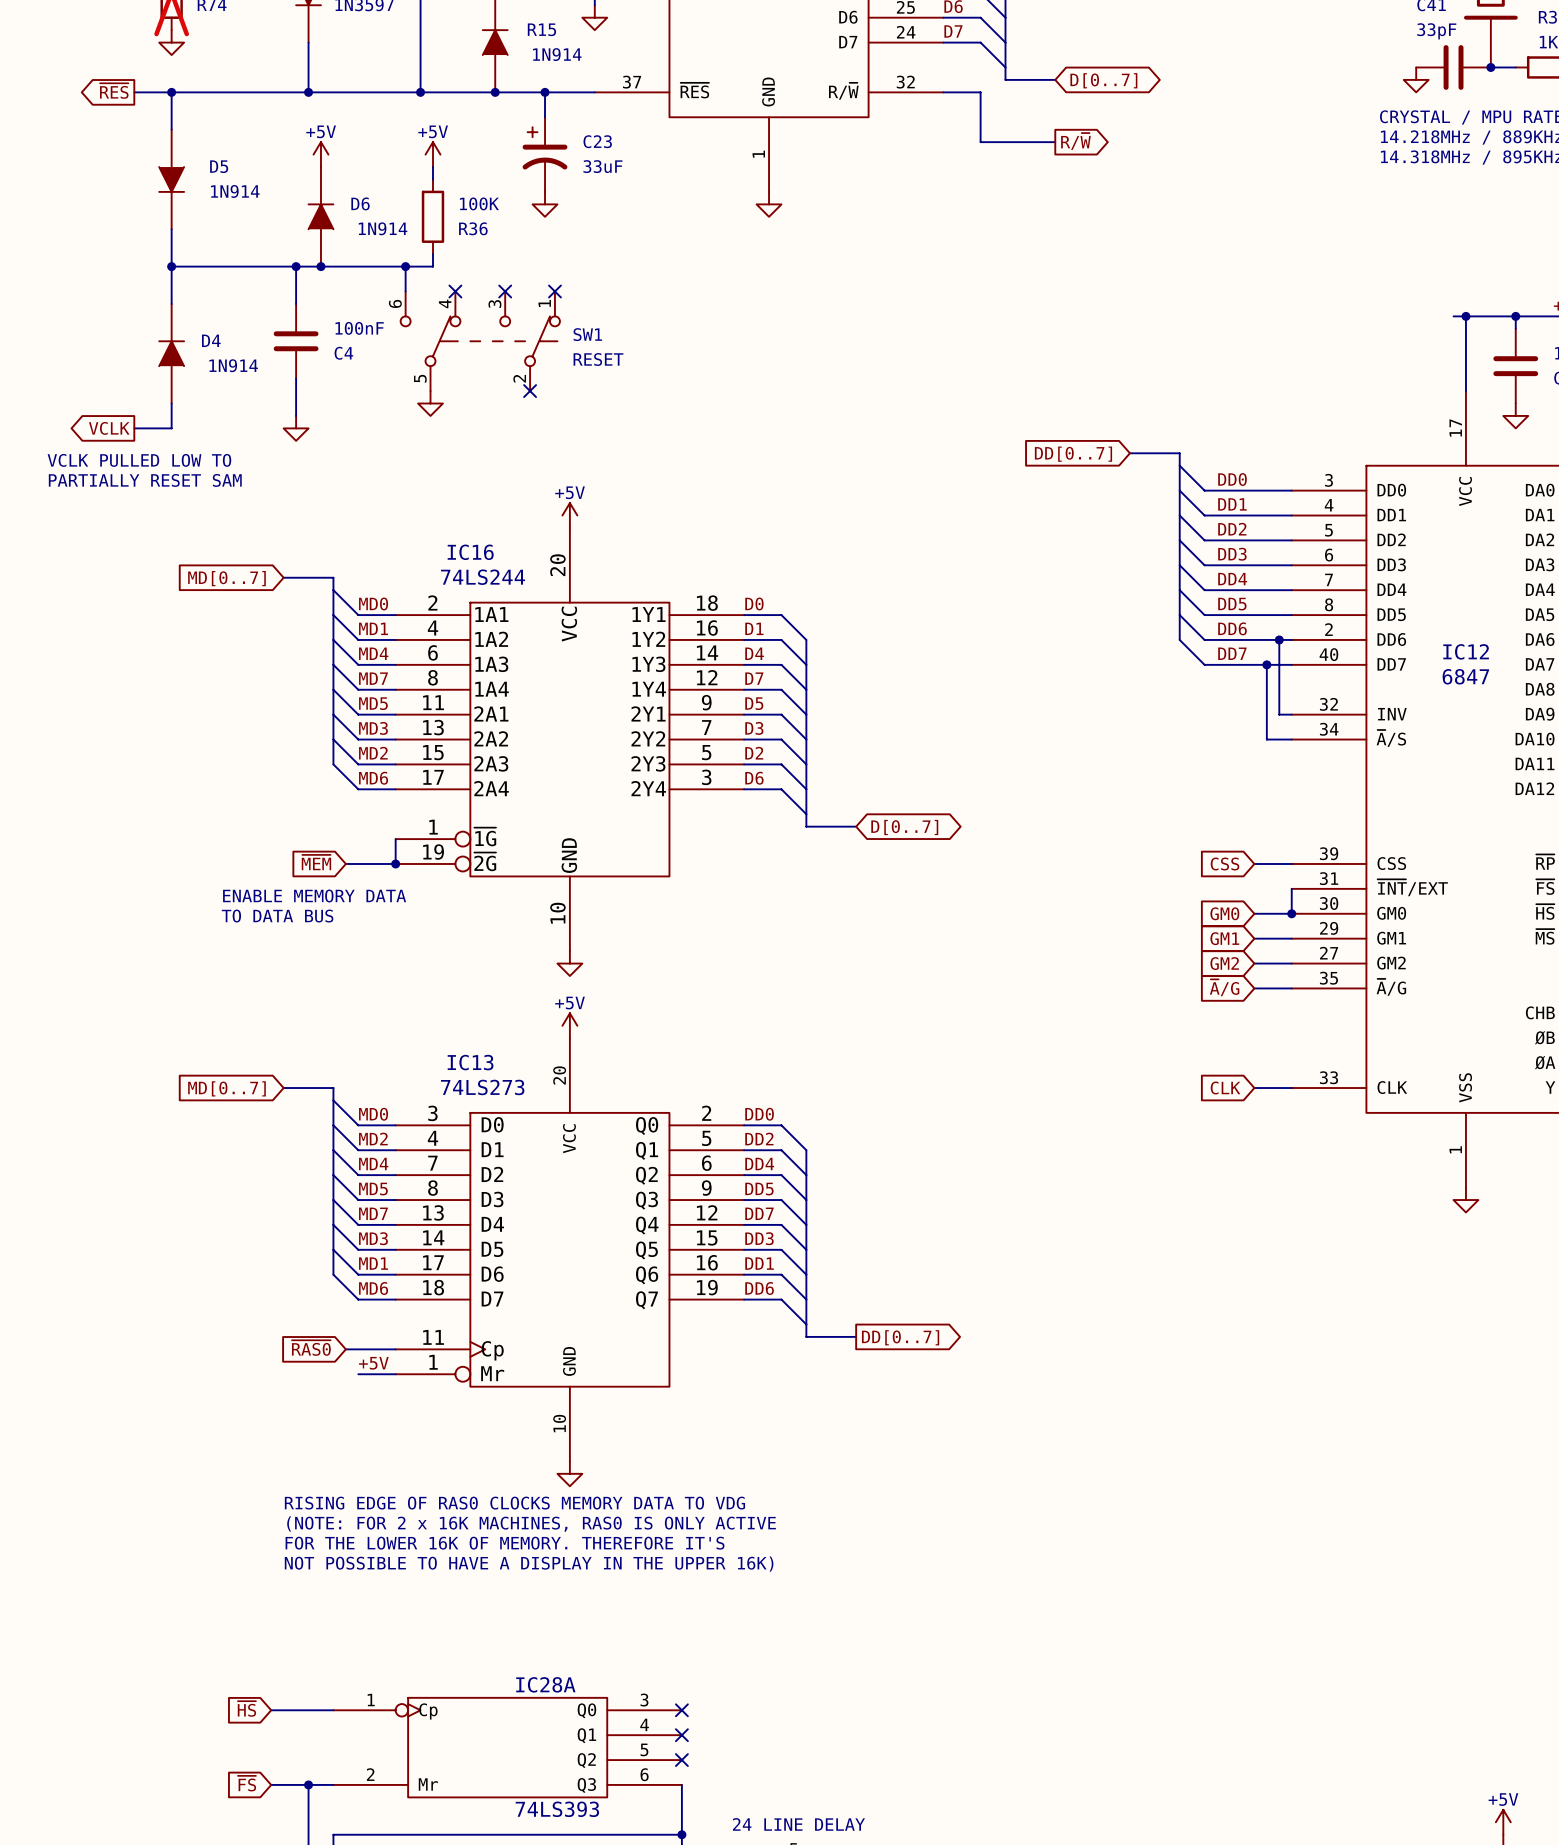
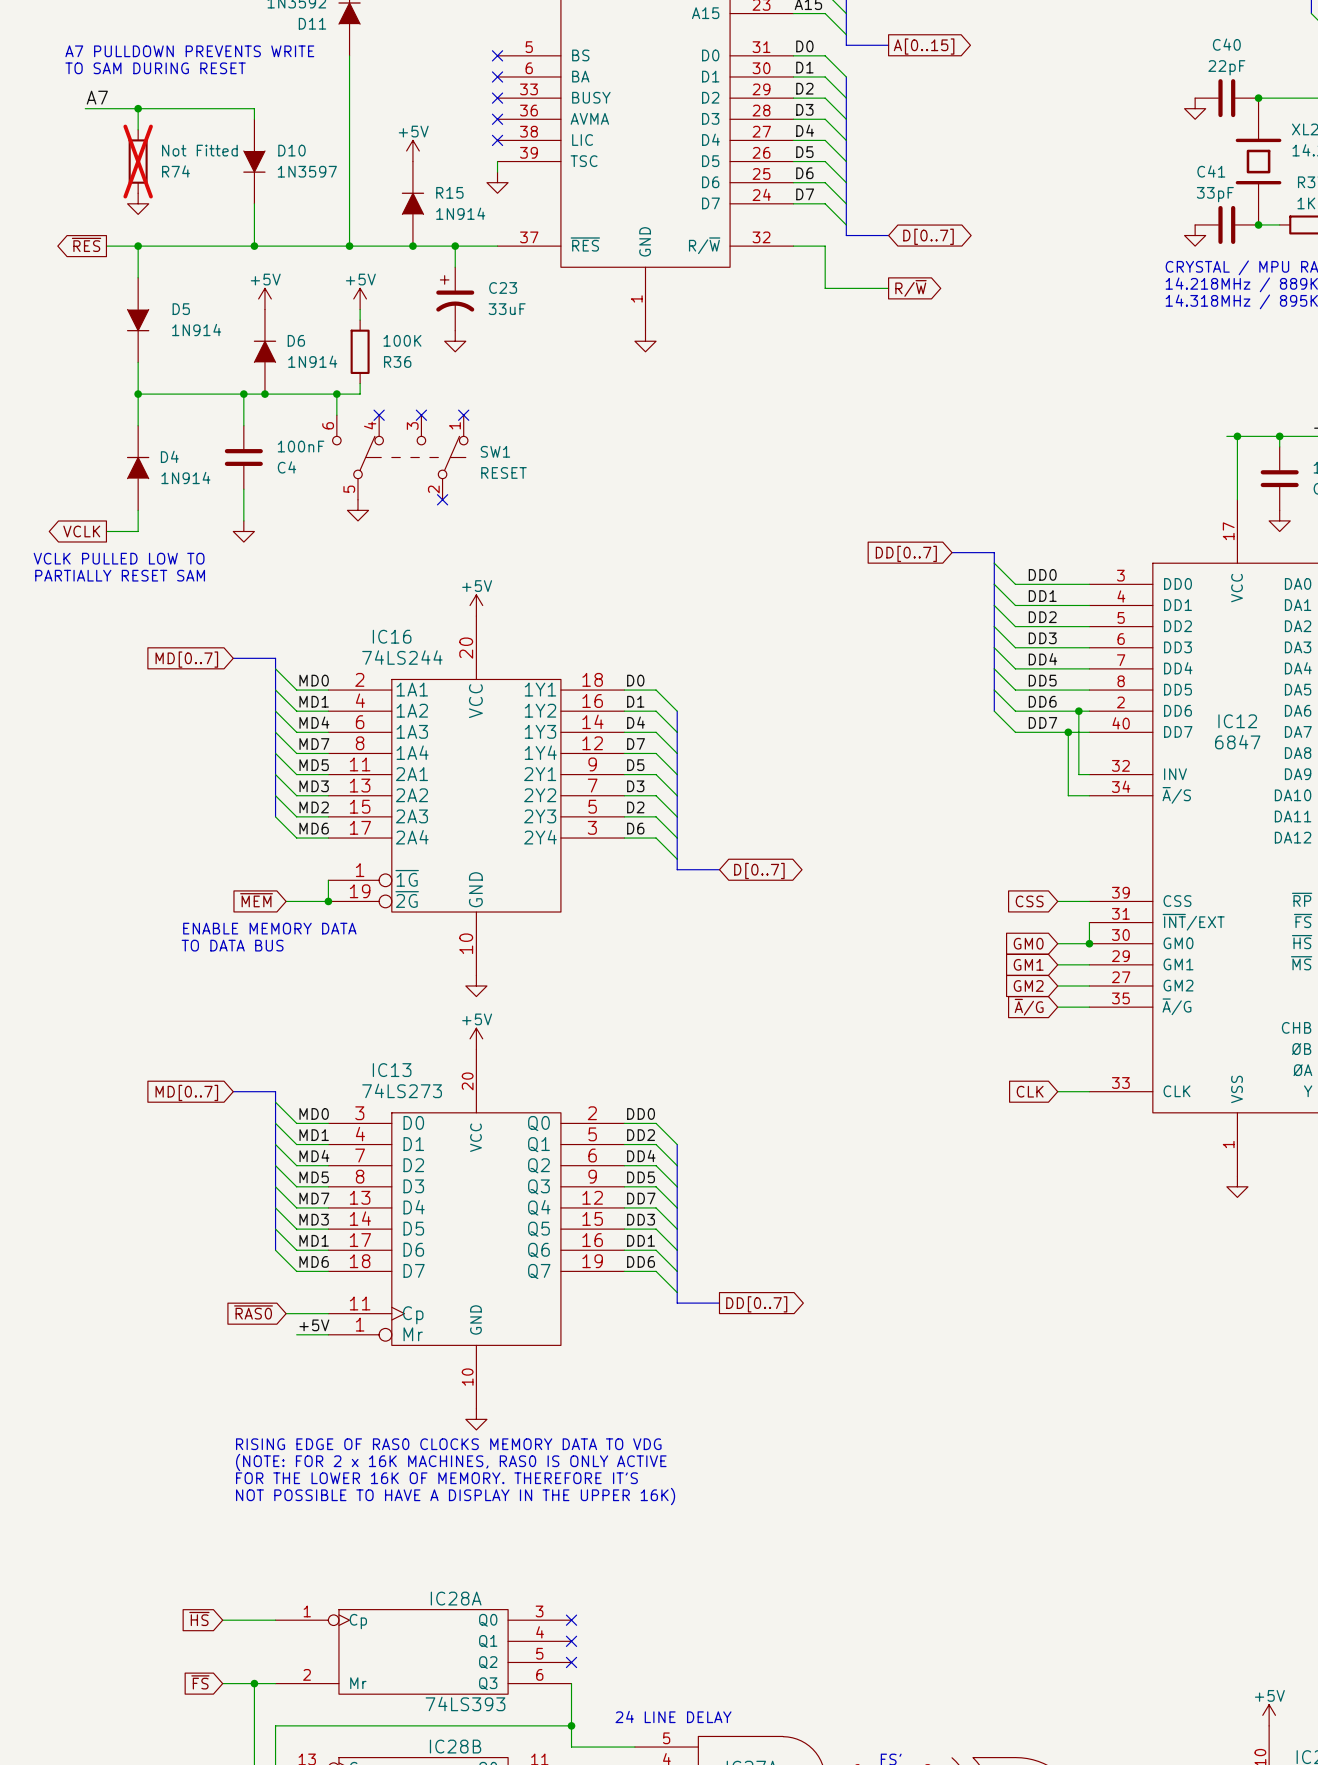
label: MD2 (373, 1139) -> MD1 (314, 1135)

